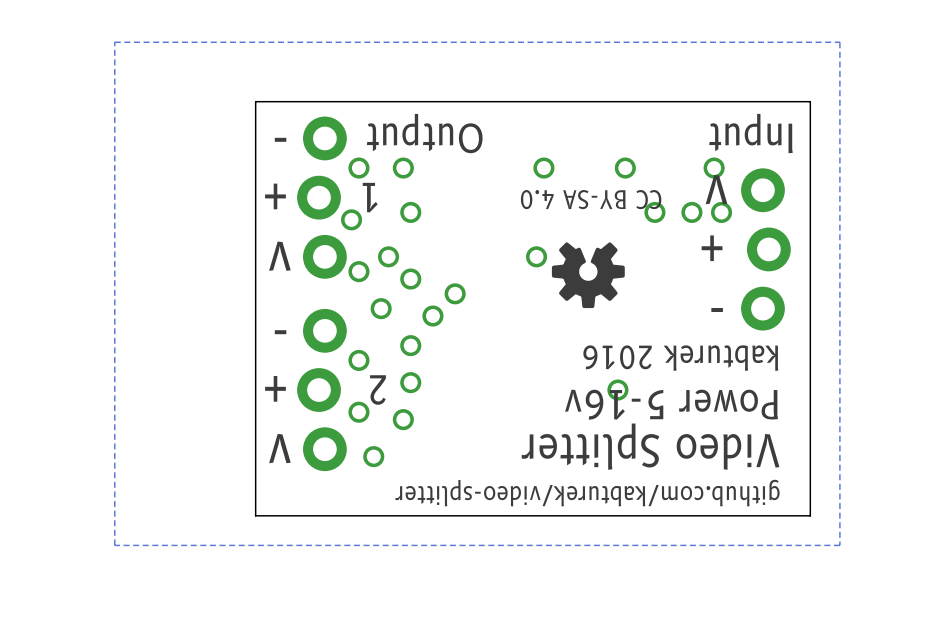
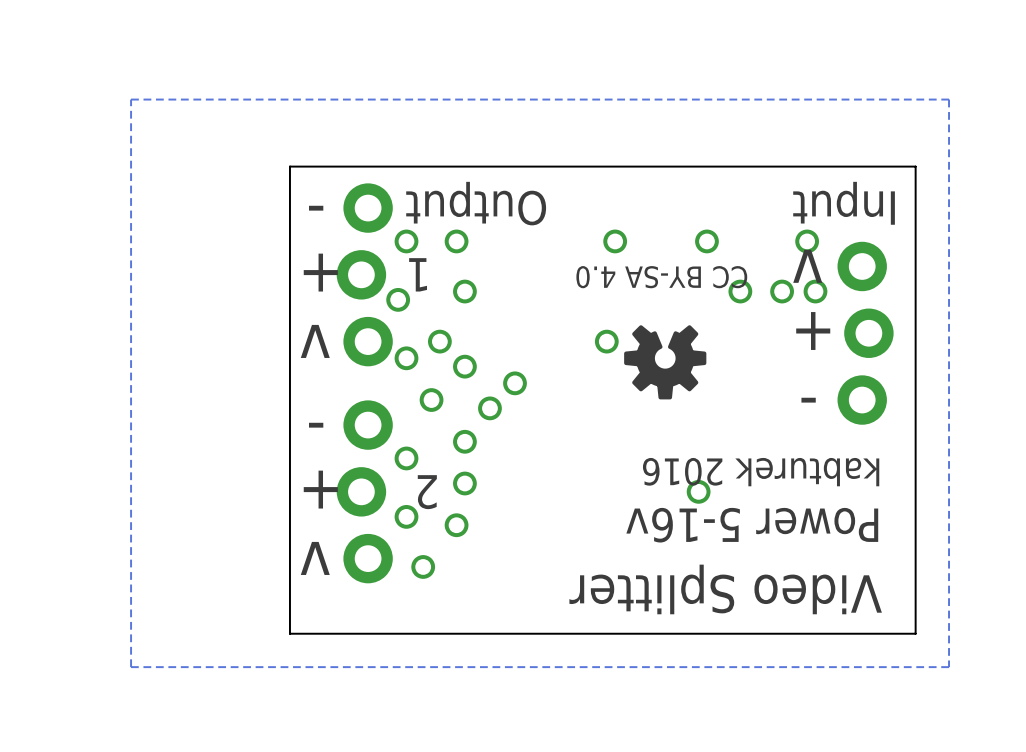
text position: kabturek 2016 (680, 358) -> kabturek 2016 (761, 472)
text position: Power 5-16v (671, 404) -> Power 5-16v (752, 525)
text position: Video Splitter (650, 446) -> Video Splitter (725, 589)
text: github.com/kabturek/video-splitter (587, 493) -> none

